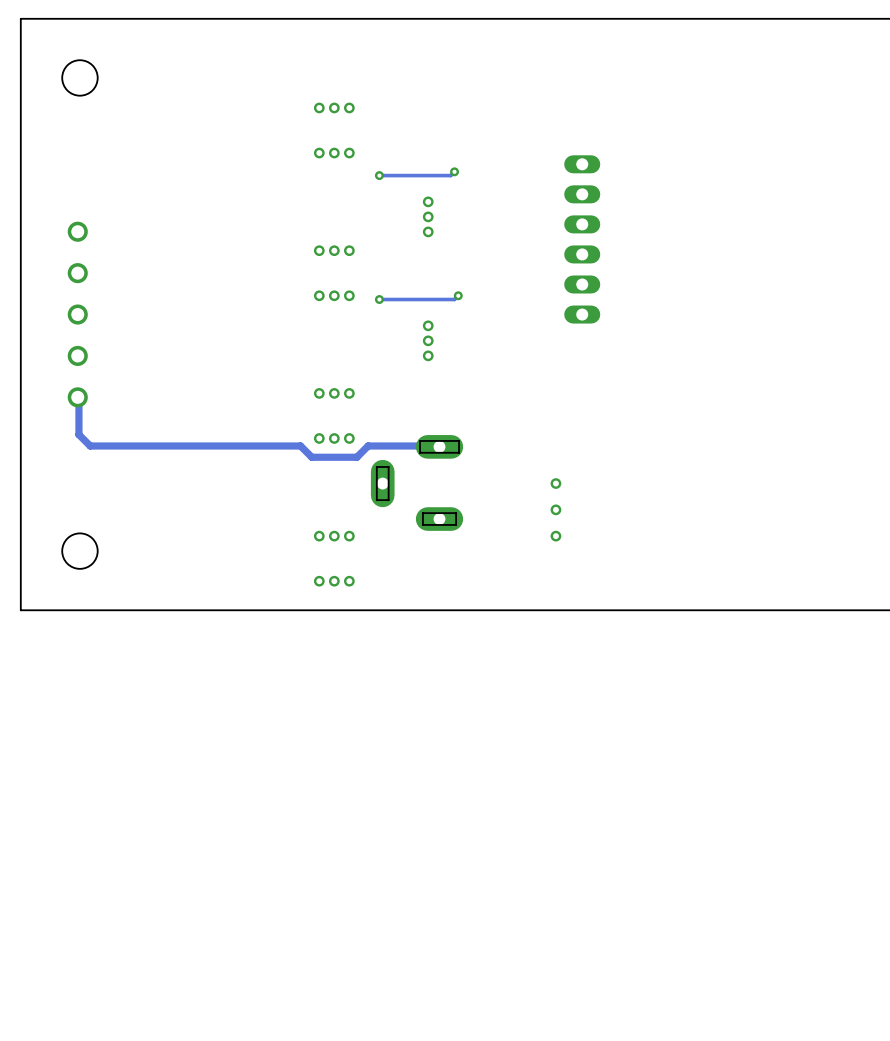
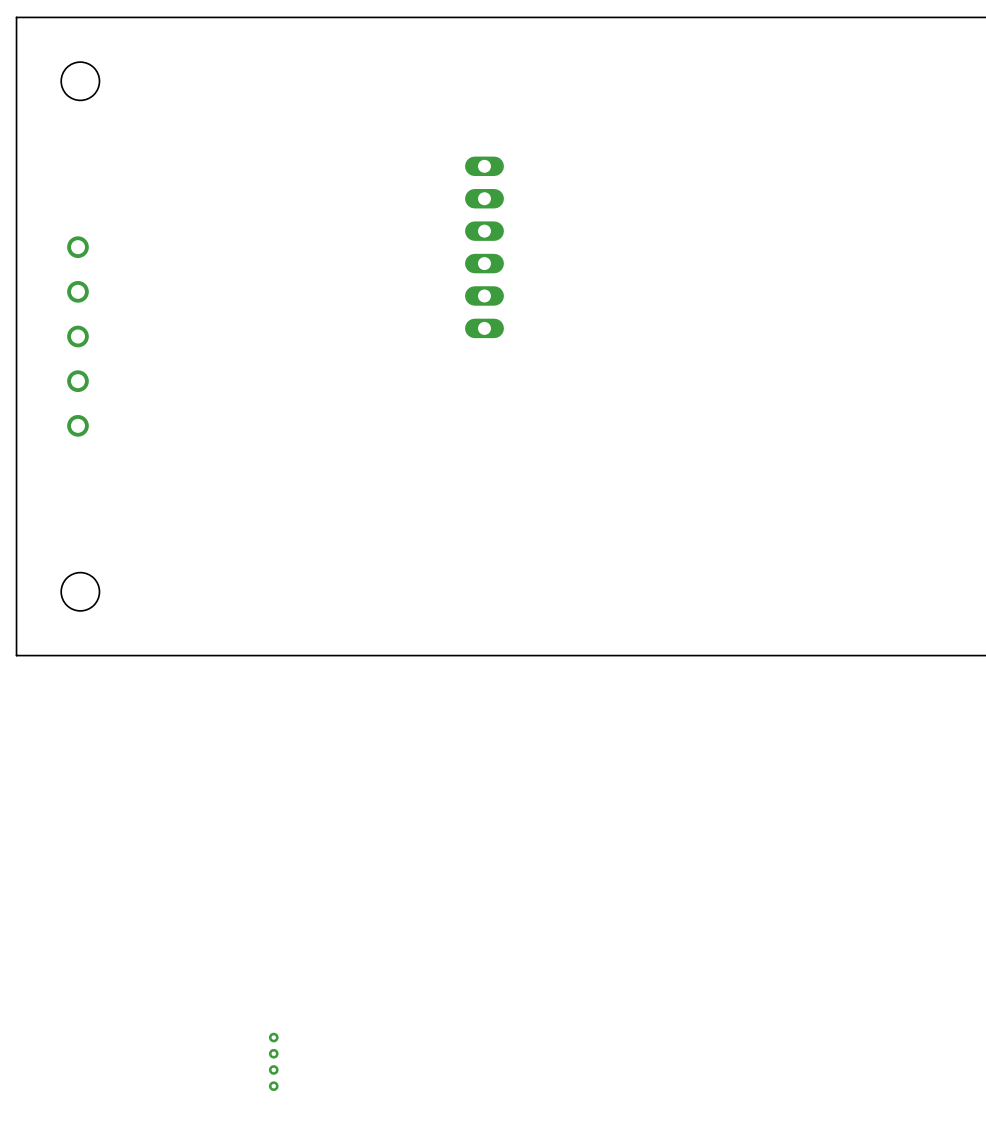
via: (319, 107) -> none
via: (334, 107) -> none
via: (349, 107) -> none
via: (319, 153) -> none
via: (334, 153) -> none
via: (349, 153) -> none
track: (454, 171) (450, 175) (379, 175) -> none
via: (454, 171) -> none
via: (379, 175) -> none
via: (428, 201) -> none
via: (428, 216) -> none
via: (428, 231) -> none
part position: (582, 239) -> (484, 247)
via: (319, 250) -> none
via: (334, 250) -> none
via: (349, 250) -> none
via: (319, 295) -> none
via: (334, 295) -> none
via: (349, 295) -> none
track: (458, 295) (454, 299) (379, 299) -> none
via: (458, 295) -> none
via: (379, 299) -> none
via: (428, 325) -> none
via: (428, 340) -> none
via: (428, 355) -> none
via: (319, 393) -> none
via: (334, 393) -> none
via: (349, 393) -> none
track: (77, 397) (78, 434) (90, 445) (300, 445) (311, 457) (356, 457) (368, 445) (439, 446) -> none
via: (319, 438) -> none
via: (334, 438) -> none
via: (349, 438) -> none
part: (417, 482) -> none
via: (555, 483) -> none
via: (555, 509) -> none
via: (319, 536) -> none
via: (334, 536) -> none
via: (349, 536) -> none
via: (555, 536) -> none
via: (319, 581) -> none
via: (334, 581) -> none
via: (349, 581) -> none
via: none -> (273, 1037)
via: none -> (273, 1053)
via: none -> (273, 1069)
via: none -> (273, 1086)

